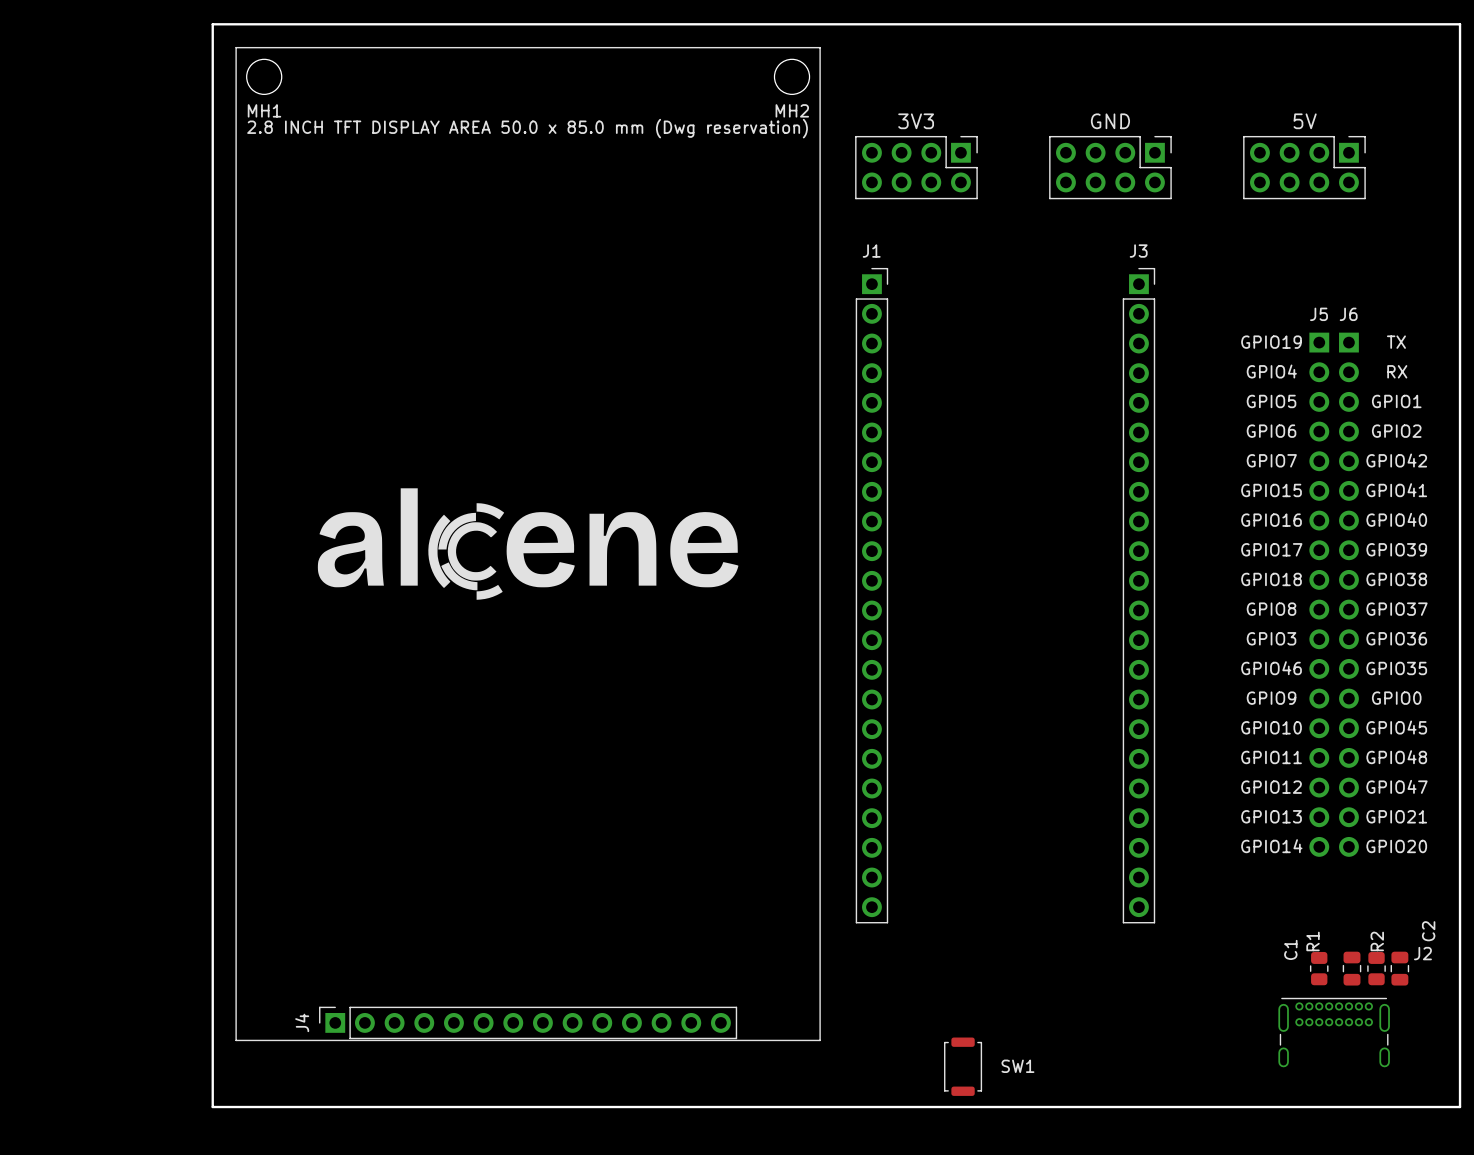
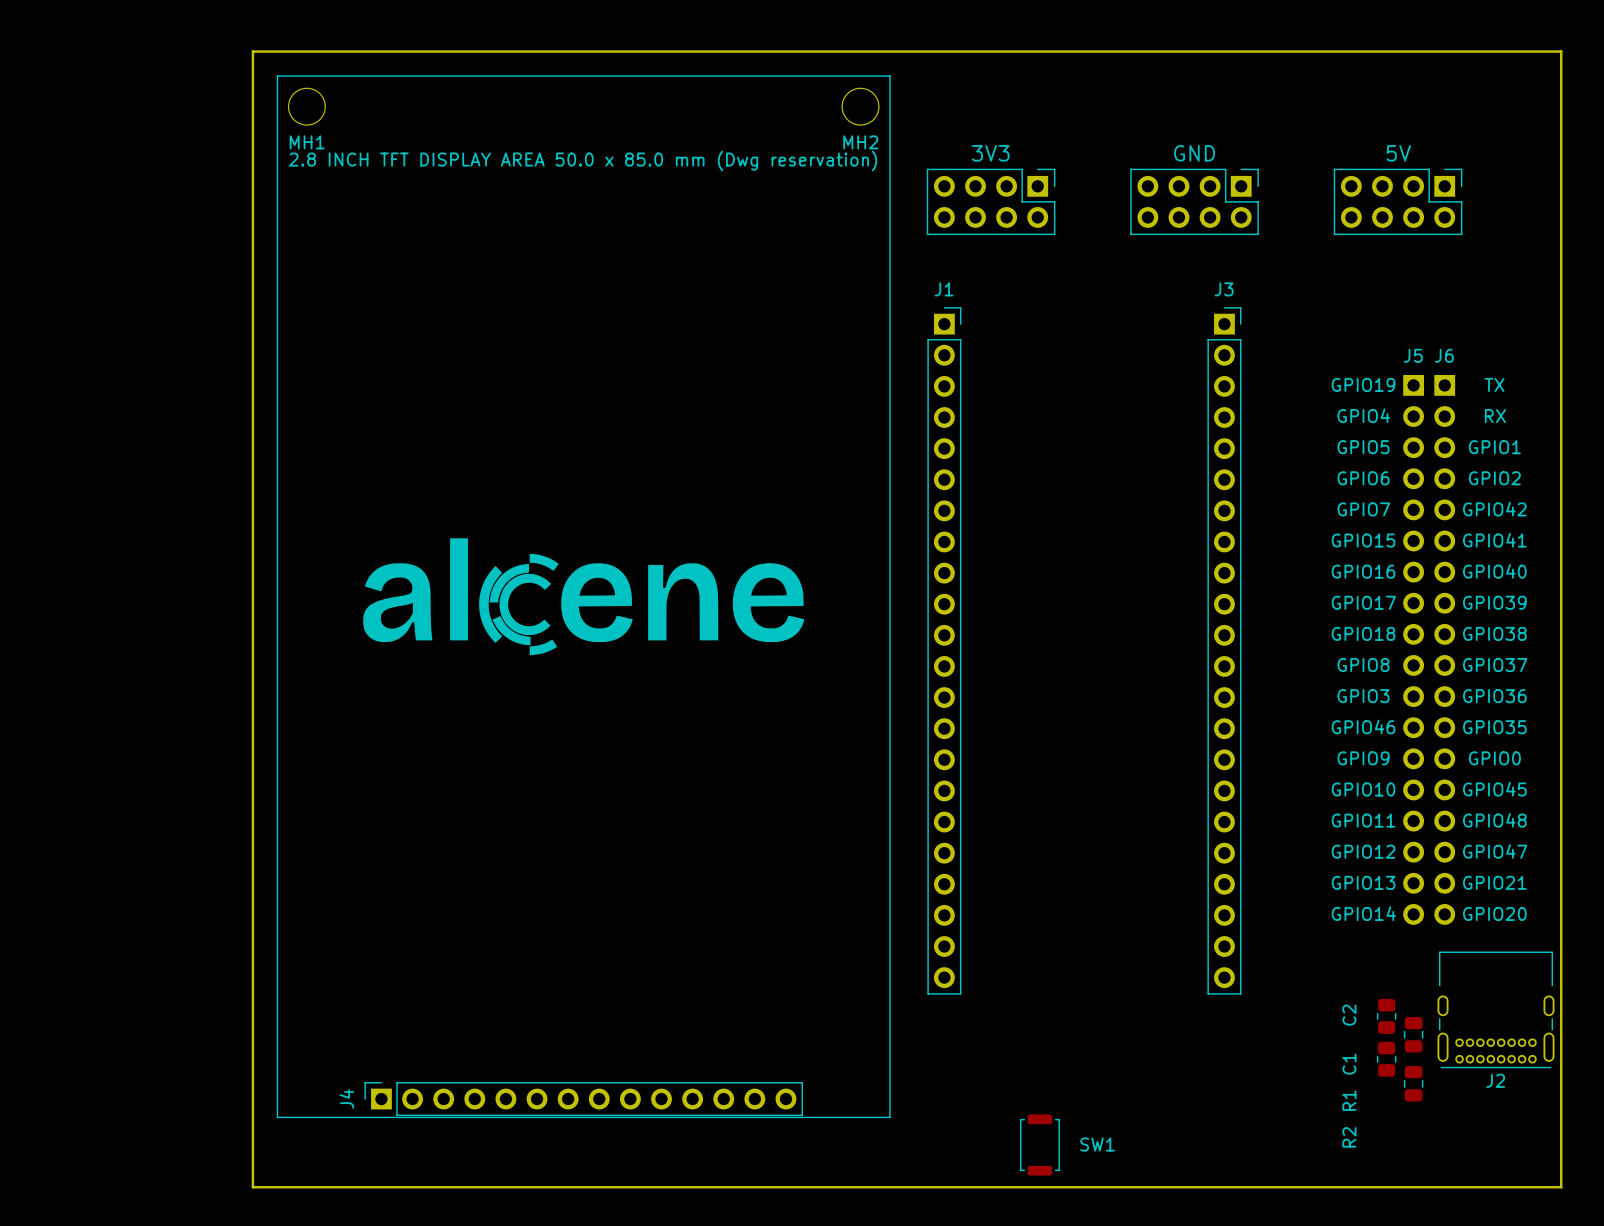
C2 name position: C2 (1428, 931) -> C2 (1349, 1015)
R1 name position: R1 (1313, 941) -> R1 (1349, 1100)
R2 name position: R2 (1377, 941) -> R2 (1349, 1137)
J2 name position: J2 (1422, 953) -> J2 (1495, 1080)
R1 position: (1319, 968) -> (1386, 1059)
C1 position: (1351, 968) -> (1413, 1083)
R2 position: (1376, 968) -> (1386, 1016)
C2 position: (1399, 968) -> (1413, 1034)
J2 footprint: [1278, 997, 1390, 1068] -> [1437, 951, 1555, 1069]

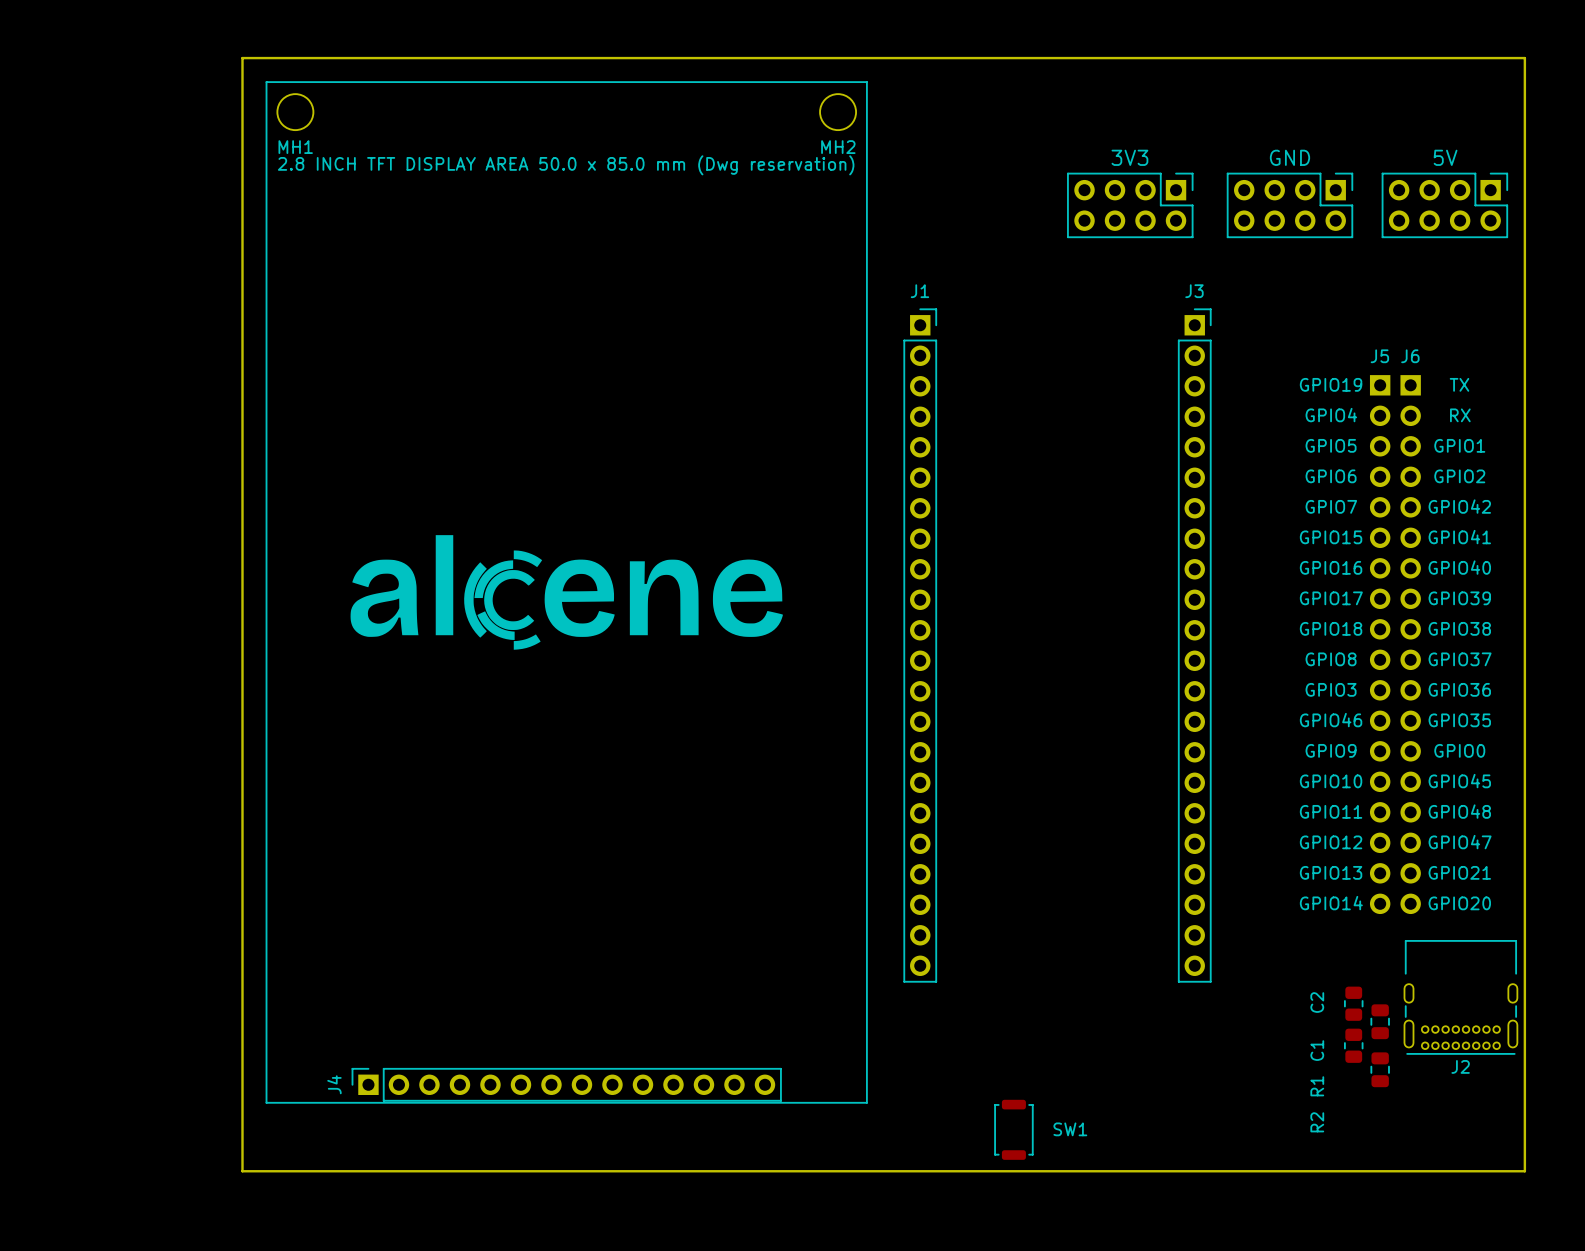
text position: 3V3 (990, 153) -> 3V3 (1129, 157)
text position: GND (1194, 153) -> GND (1289, 157)
text position: 5V (1398, 153) -> 5V (1445, 157)
part: (991, 201) -> none
part position: (1194, 201) -> (1130, 205)
part: none -> (1289, 205)
part: (1398, 201) -> none
part: none -> (1444, 205)

